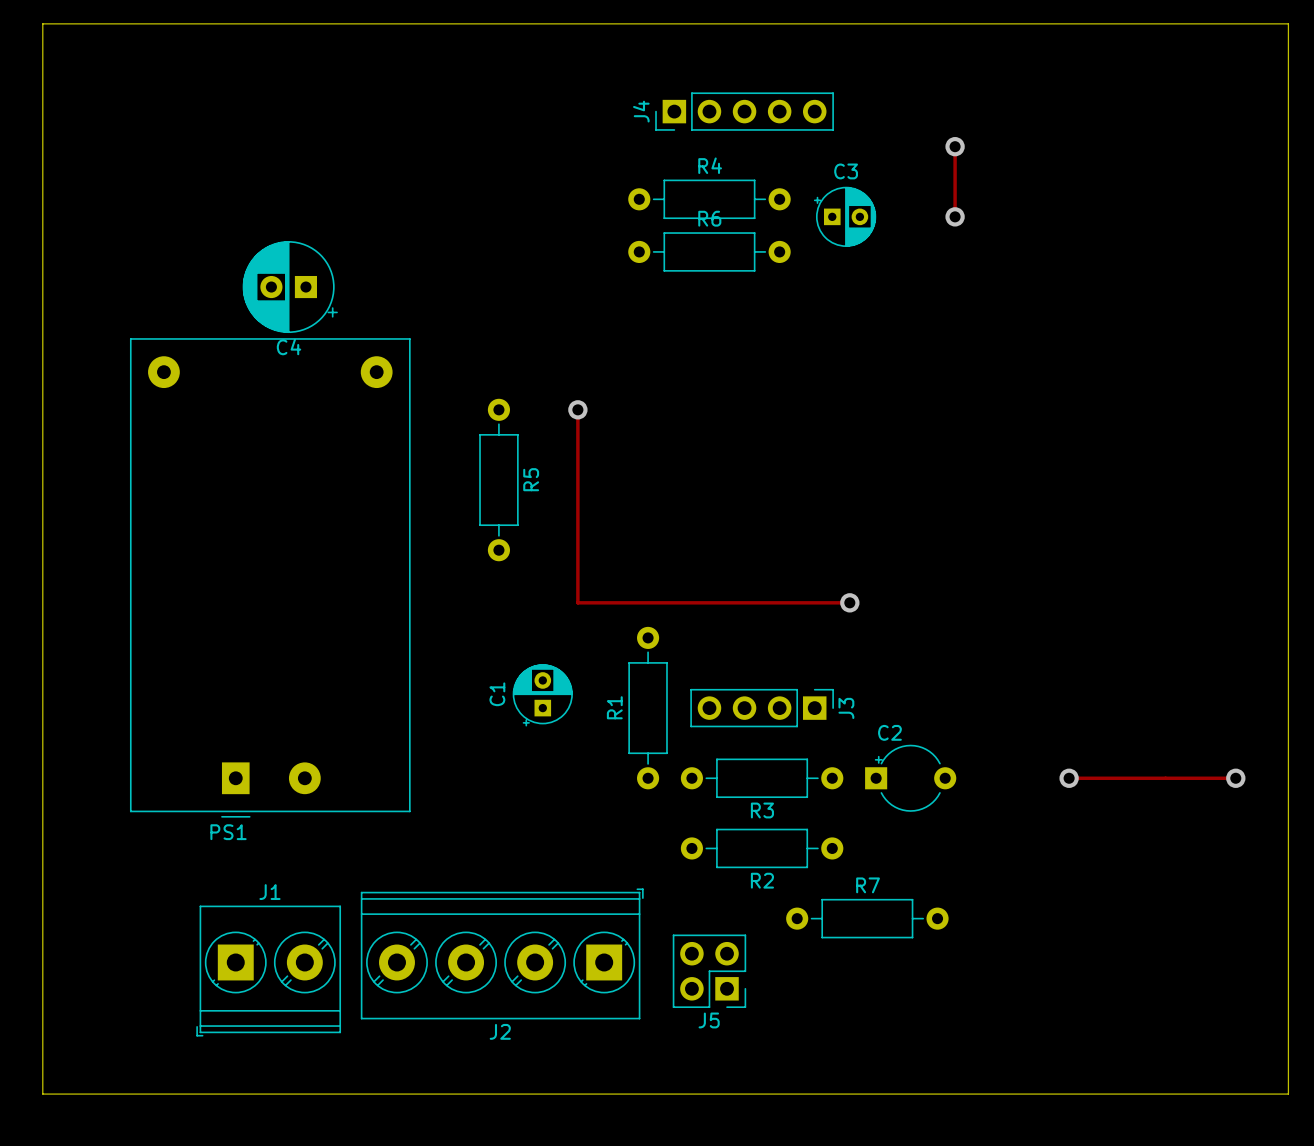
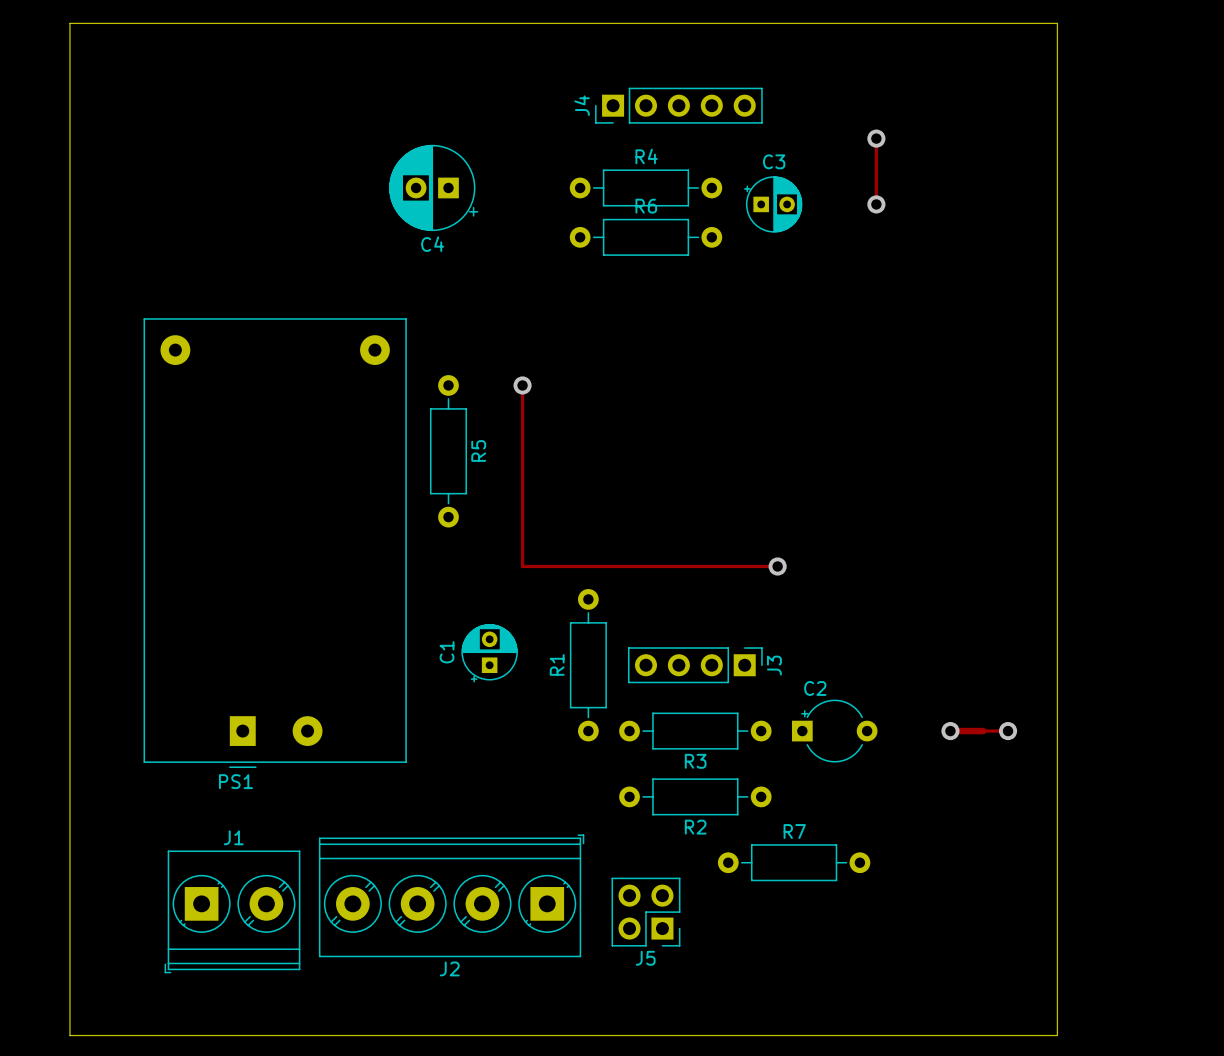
board edge: (95, 23) (42, 23) (42, 1094) (1288, 1094) (1288, 23) (1148, 23) -> (69, 23) (69, 1035) (1057, 1035) (1057, 23)
C4 position: (290, 287) -> (433, 187)
PS1 position: (270, 577) -> (275, 543)
track: none -> (950, 731) (983, 731)
via: none -> (950, 731)
via: (1069, 778) -> none
track: (1095, 778) (1235, 778) -> none
via: none -> (1008, 731)
via: (1235, 778) -> none

